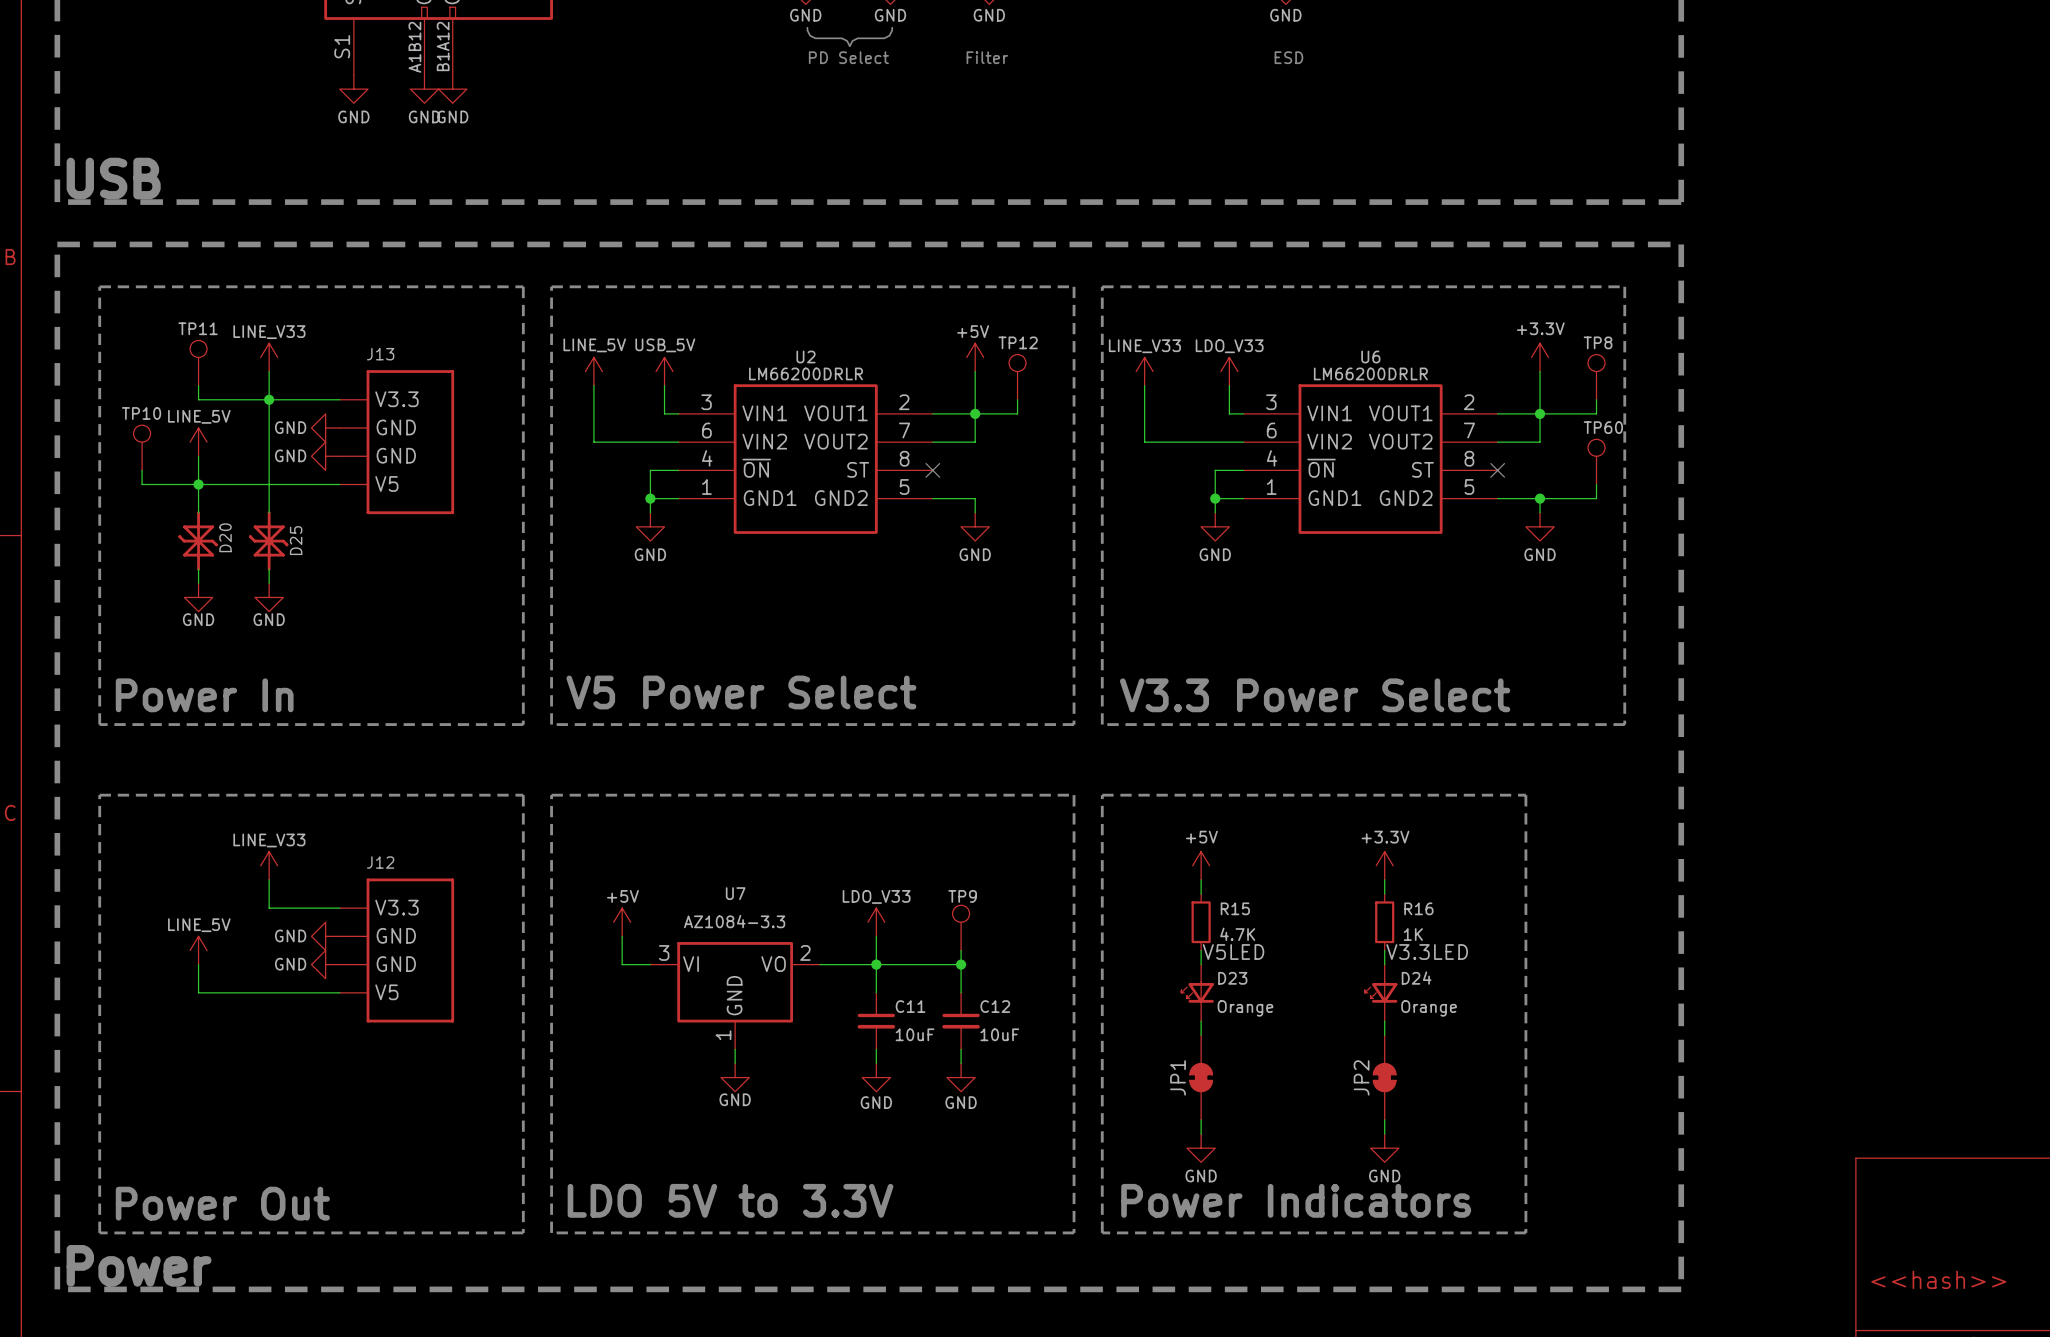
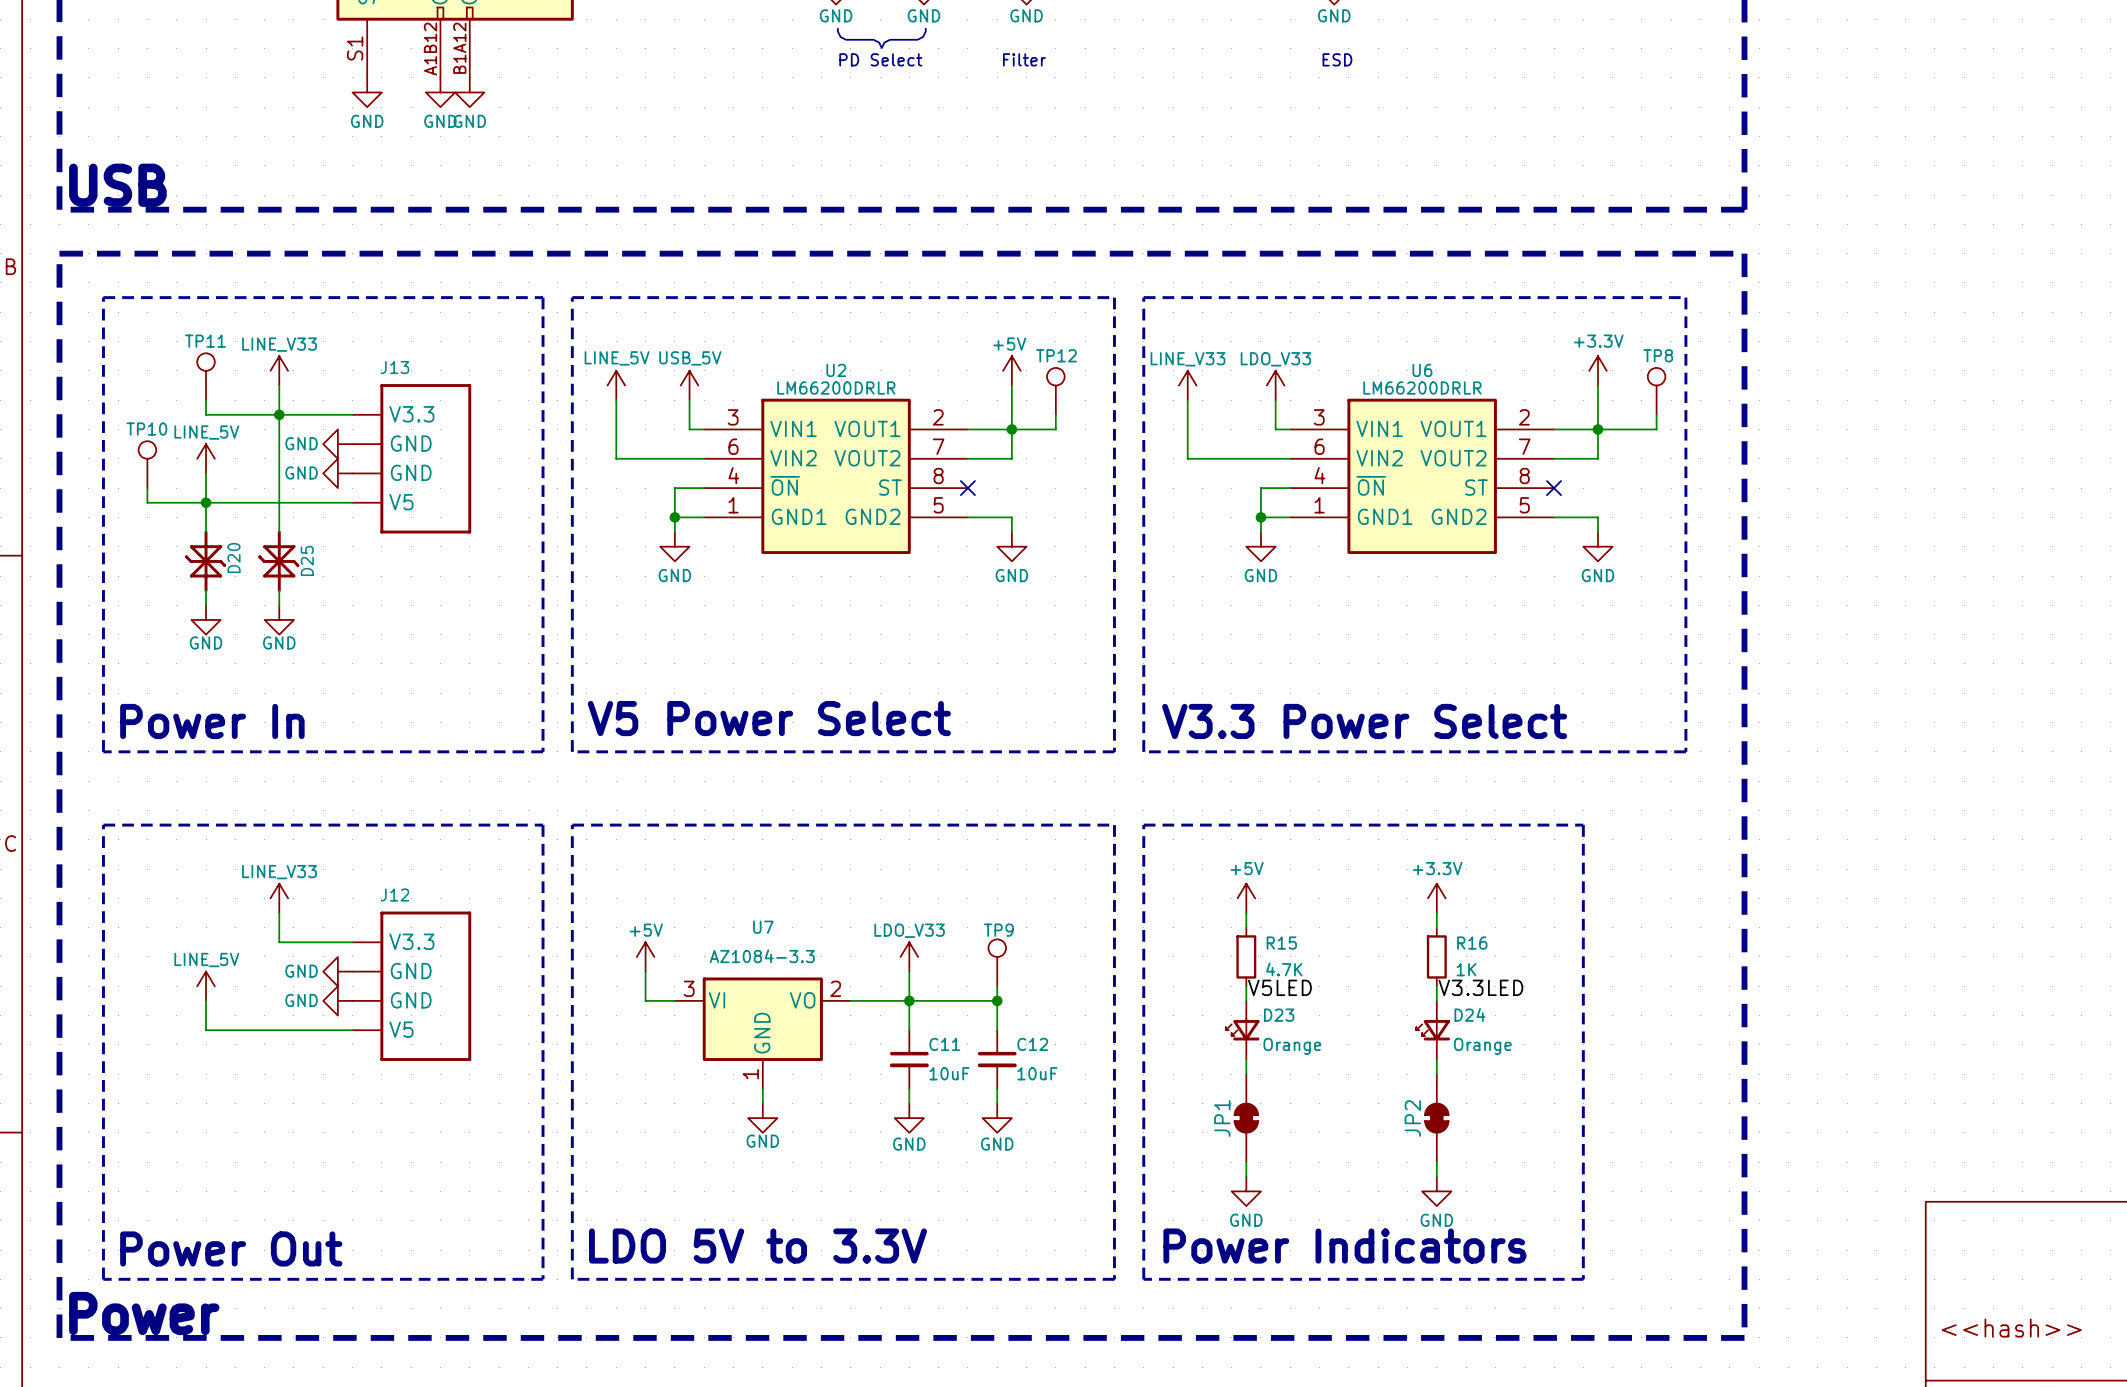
TP60: (1596, 461) -> none
wire: (1596, 484) (1596, 498) (1540, 498) -> none
junction: (1540, 498) -> none

